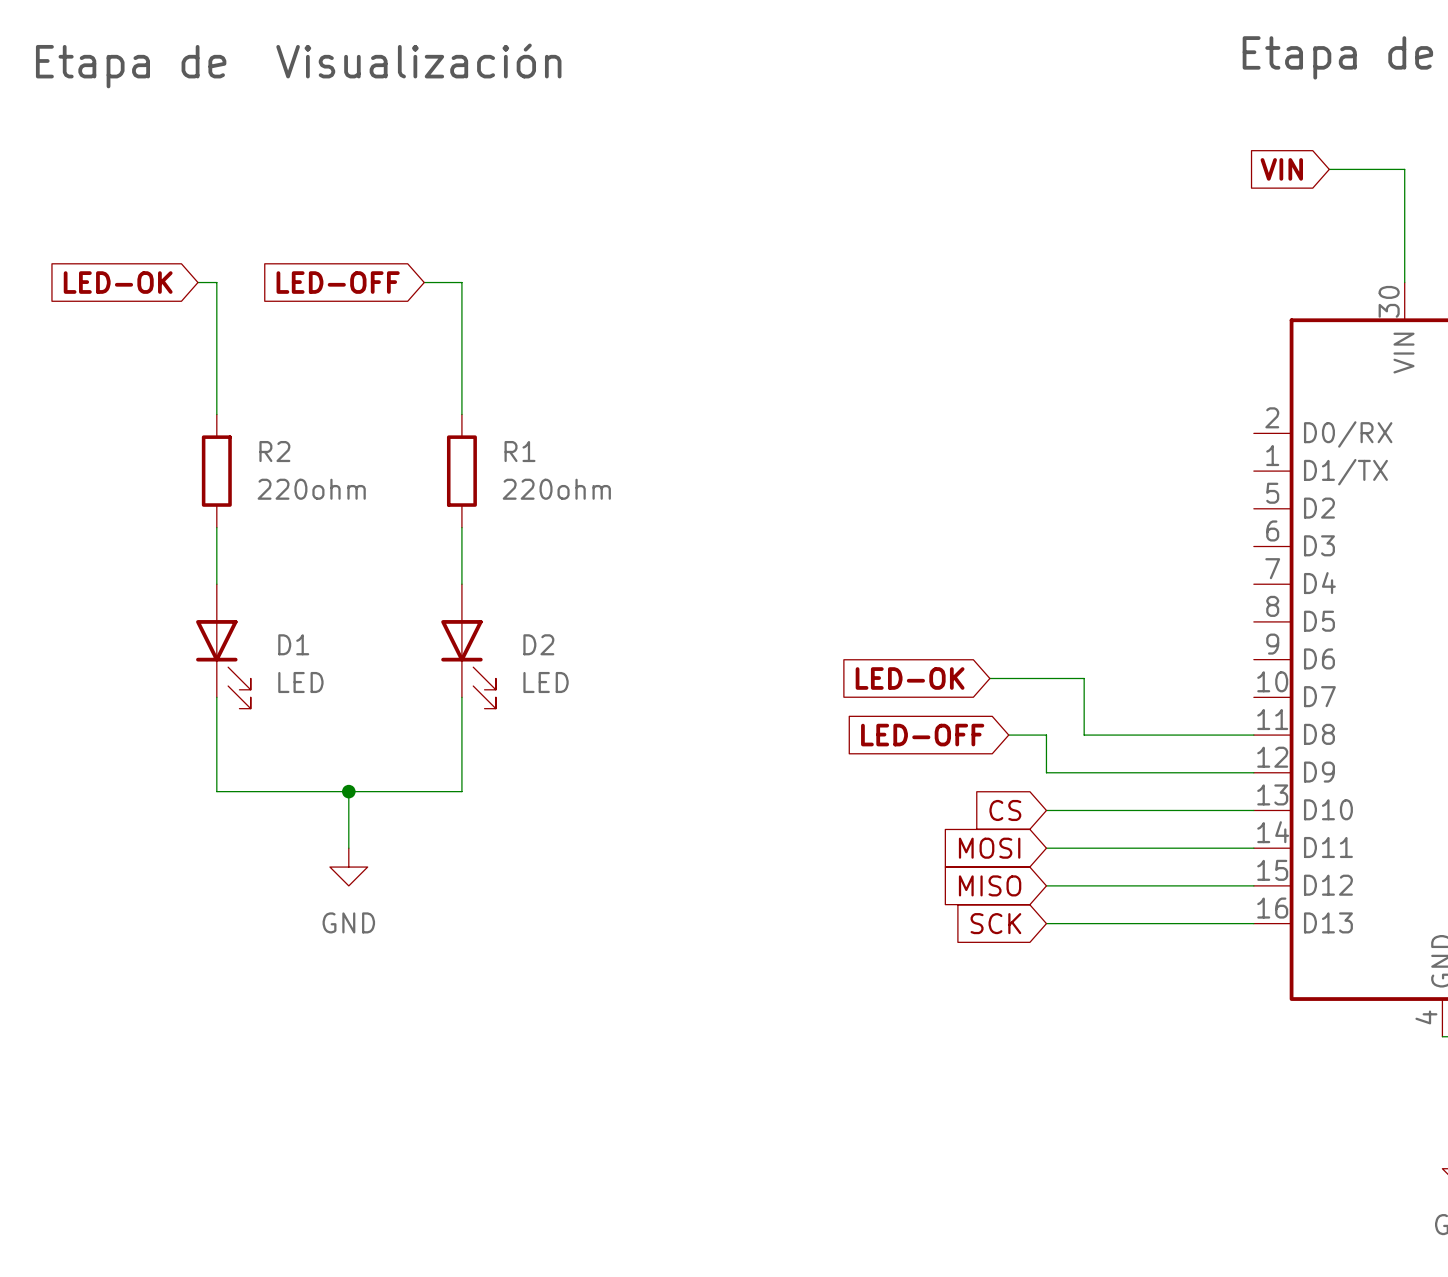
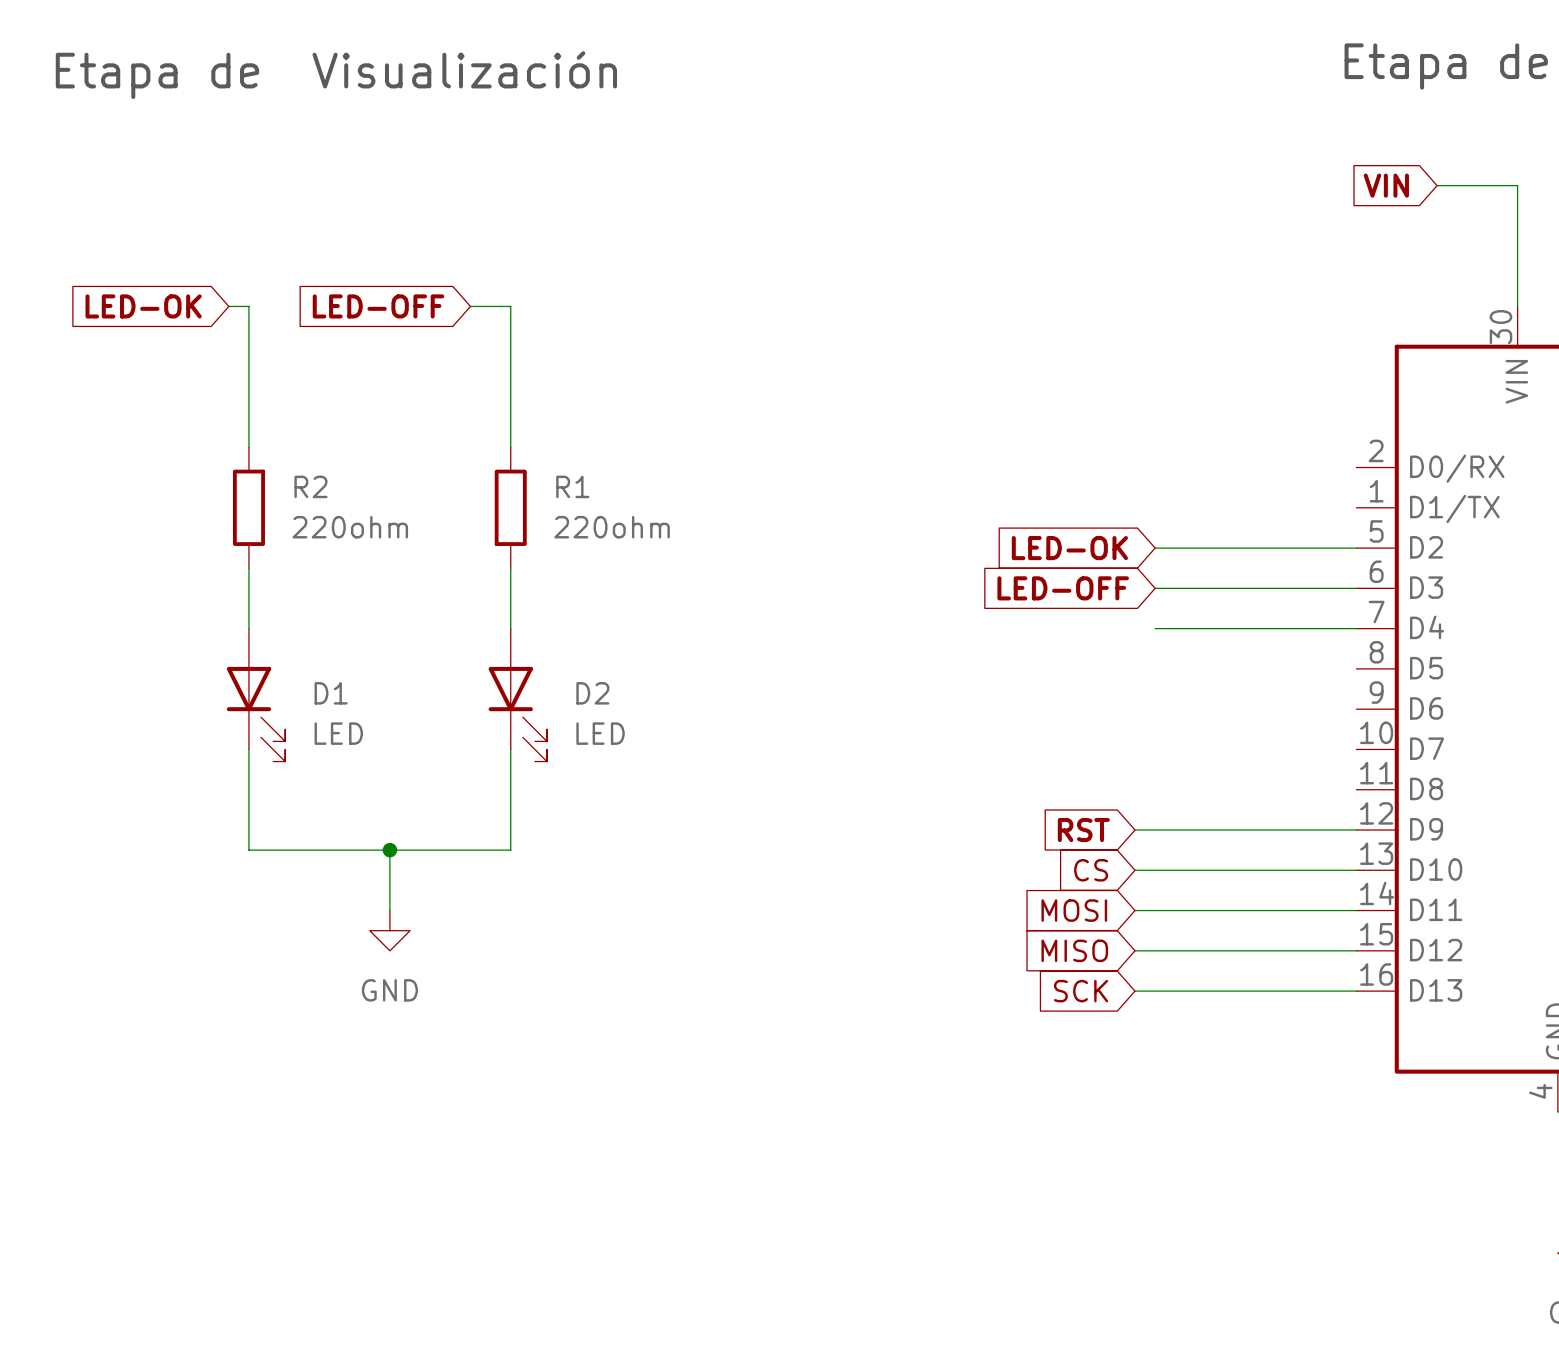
wire: none -> (1155, 548) (1356, 548)
wire: none -> (1155, 588) (1356, 588)
wire: none -> (1155, 628) (1356, 628)
global label position: LED-OK (910, 678) -> LED-OK (1069, 548)
wire: (989, 678) (1084, 678) (1084, 735) (1253, 735) -> none
global label position: LED-OFF (922, 735) -> LED-OFF (1063, 588)
wire: (1008, 735) (1046, 735) (1046, 772) -> none
global label: none -> RST (1083, 830)

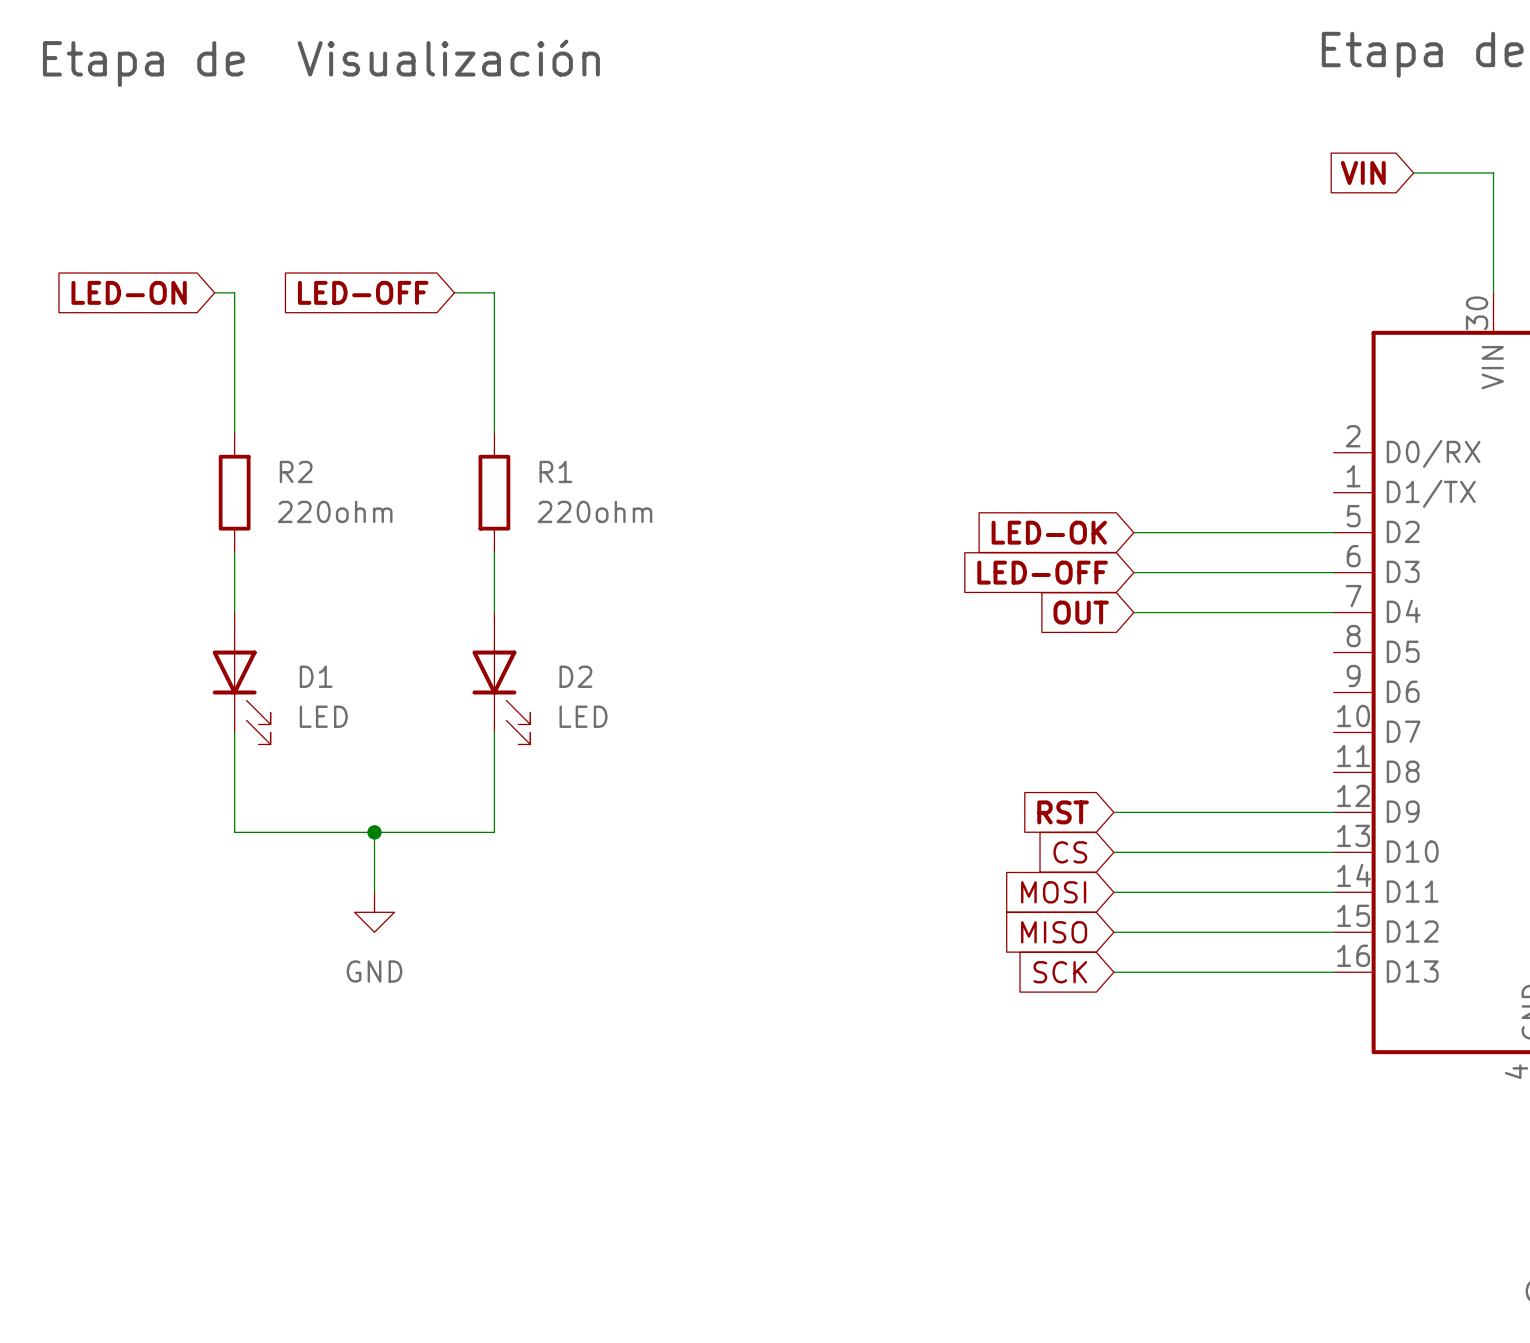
global label: LED-OK (143, 306) -> LED-ON (129, 292)
global label: none -> OUT (1081, 612)

